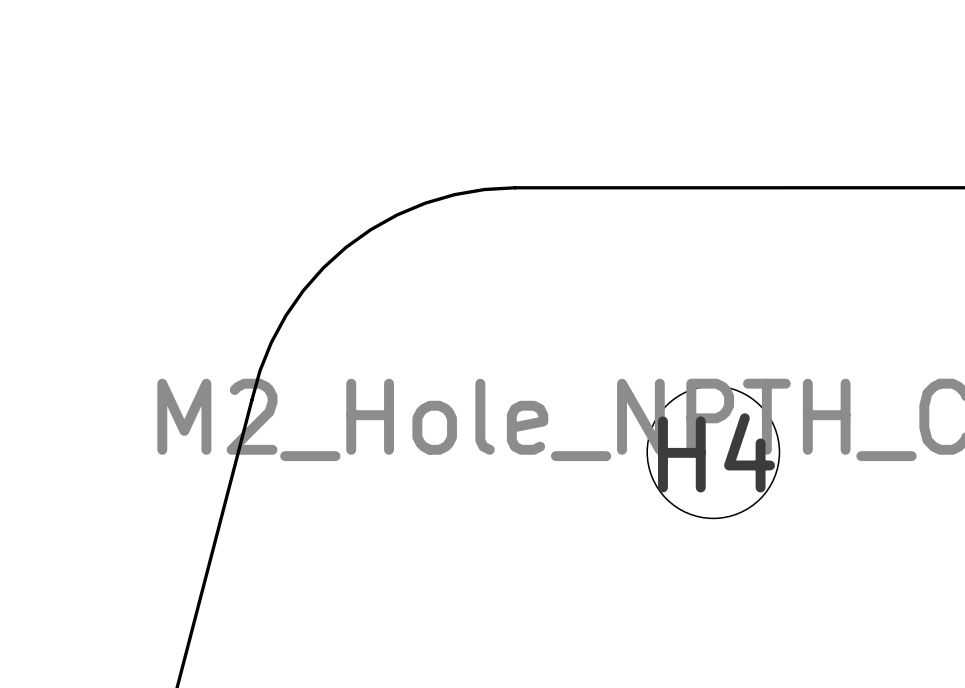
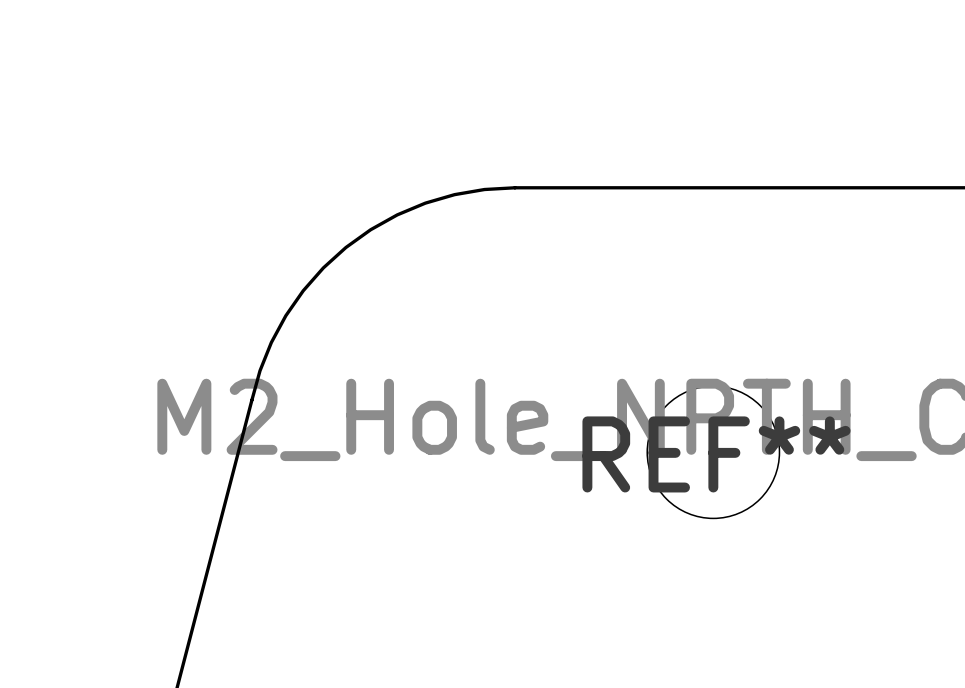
H4 name: H4 (716, 452) -> REF** (716, 454)

